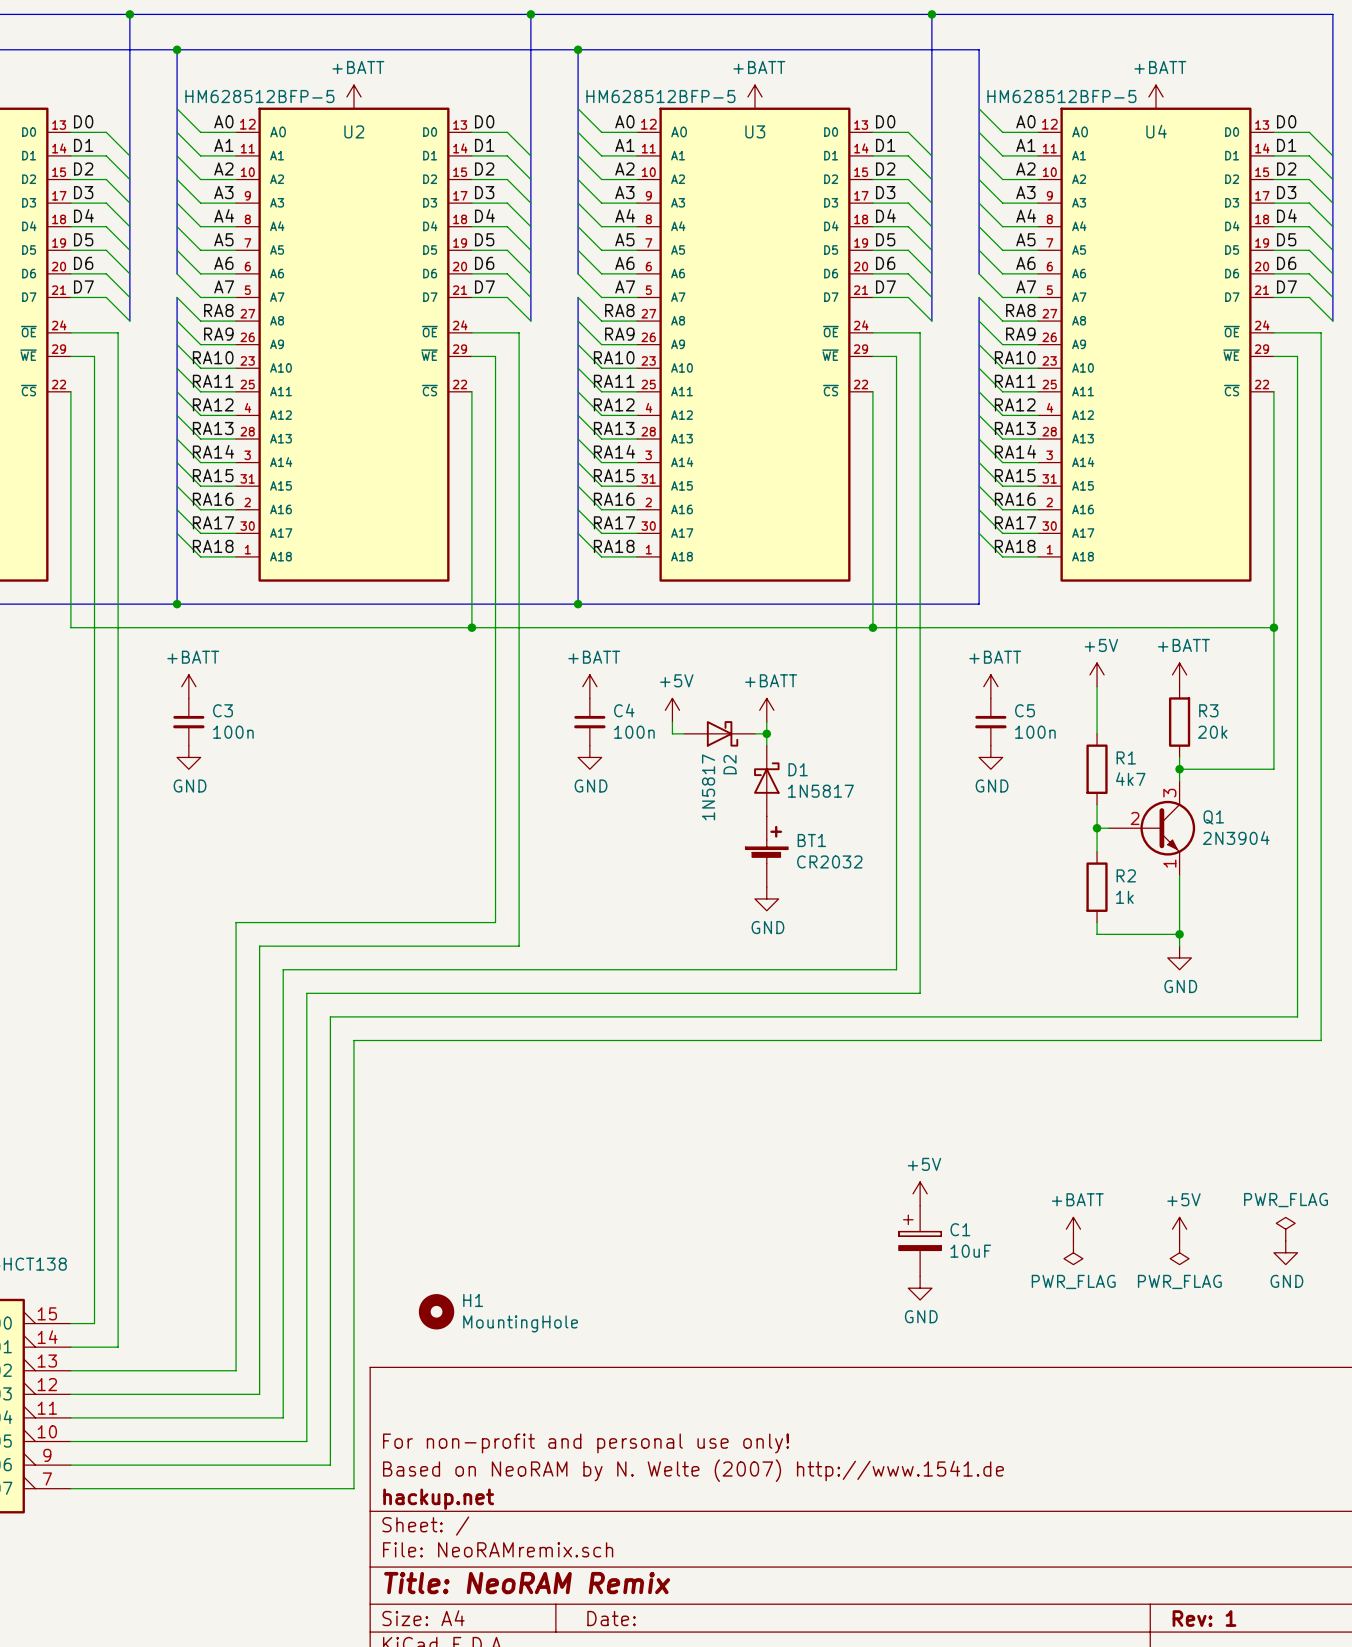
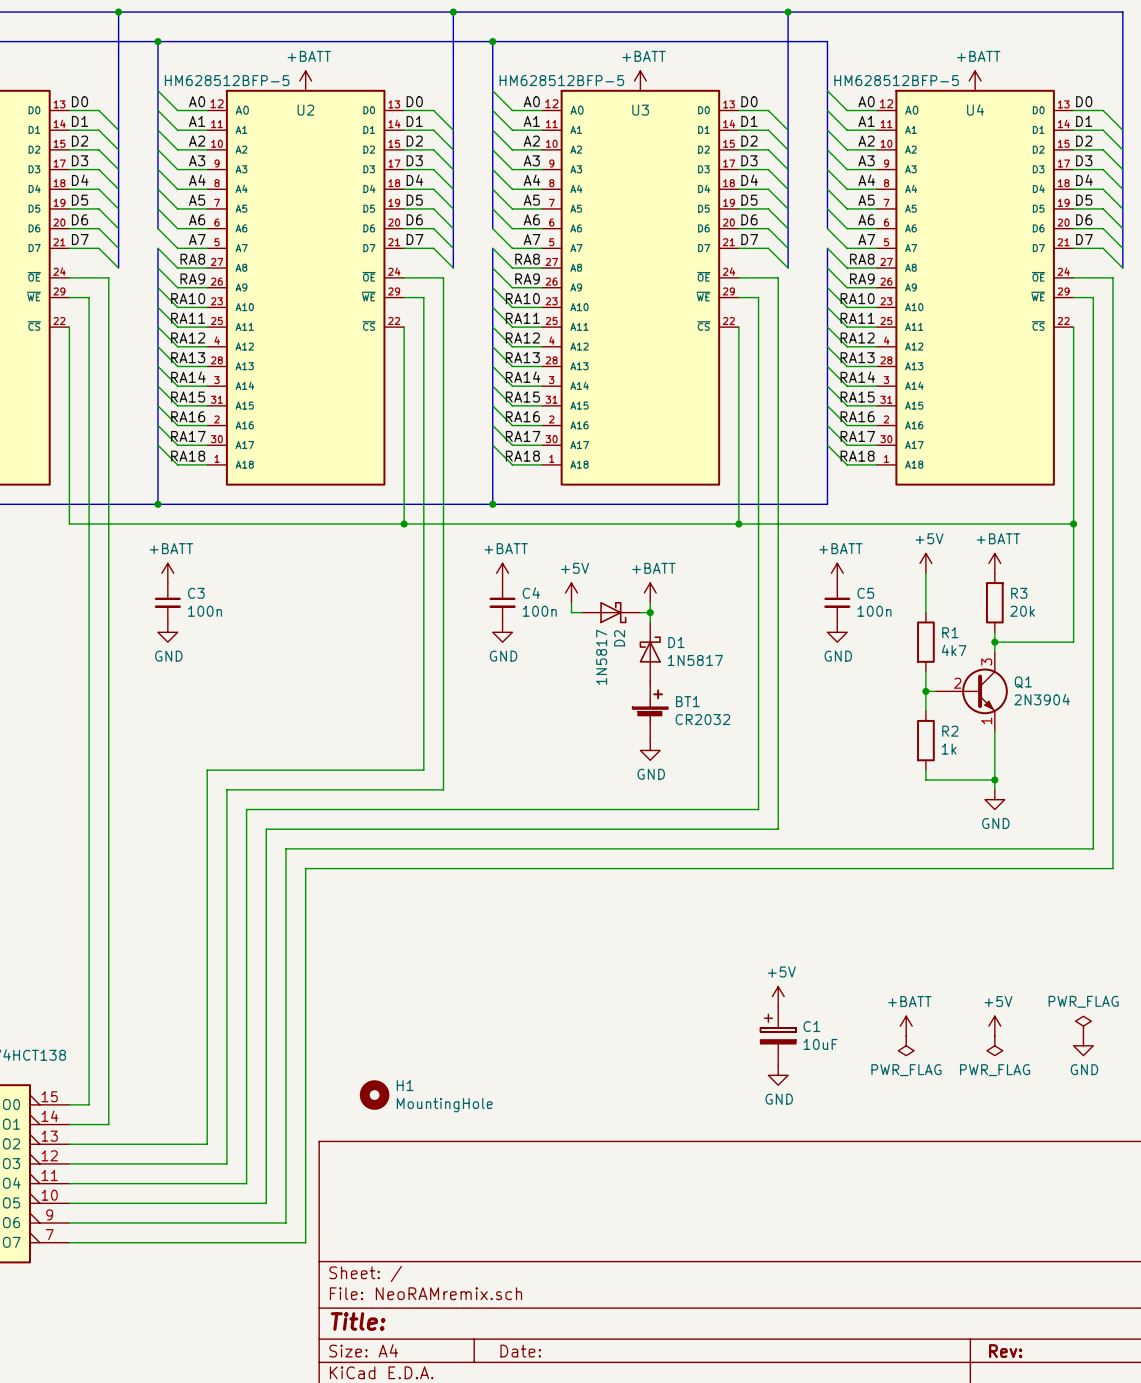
title block: For non-profit and personal use only! (586, 1443) -> none
title block: Based on NeoRAM by N. Welte (2007) http://www.1541.de (693, 1470) -> none
title block: hackup.net (438, 1499) -> none
title block: Title: NeoRAM Remix (527, 1583) -> Title: (358, 1321)
title block: Rev: 1 (1204, 1618) -> Rev: (1005, 1351)

